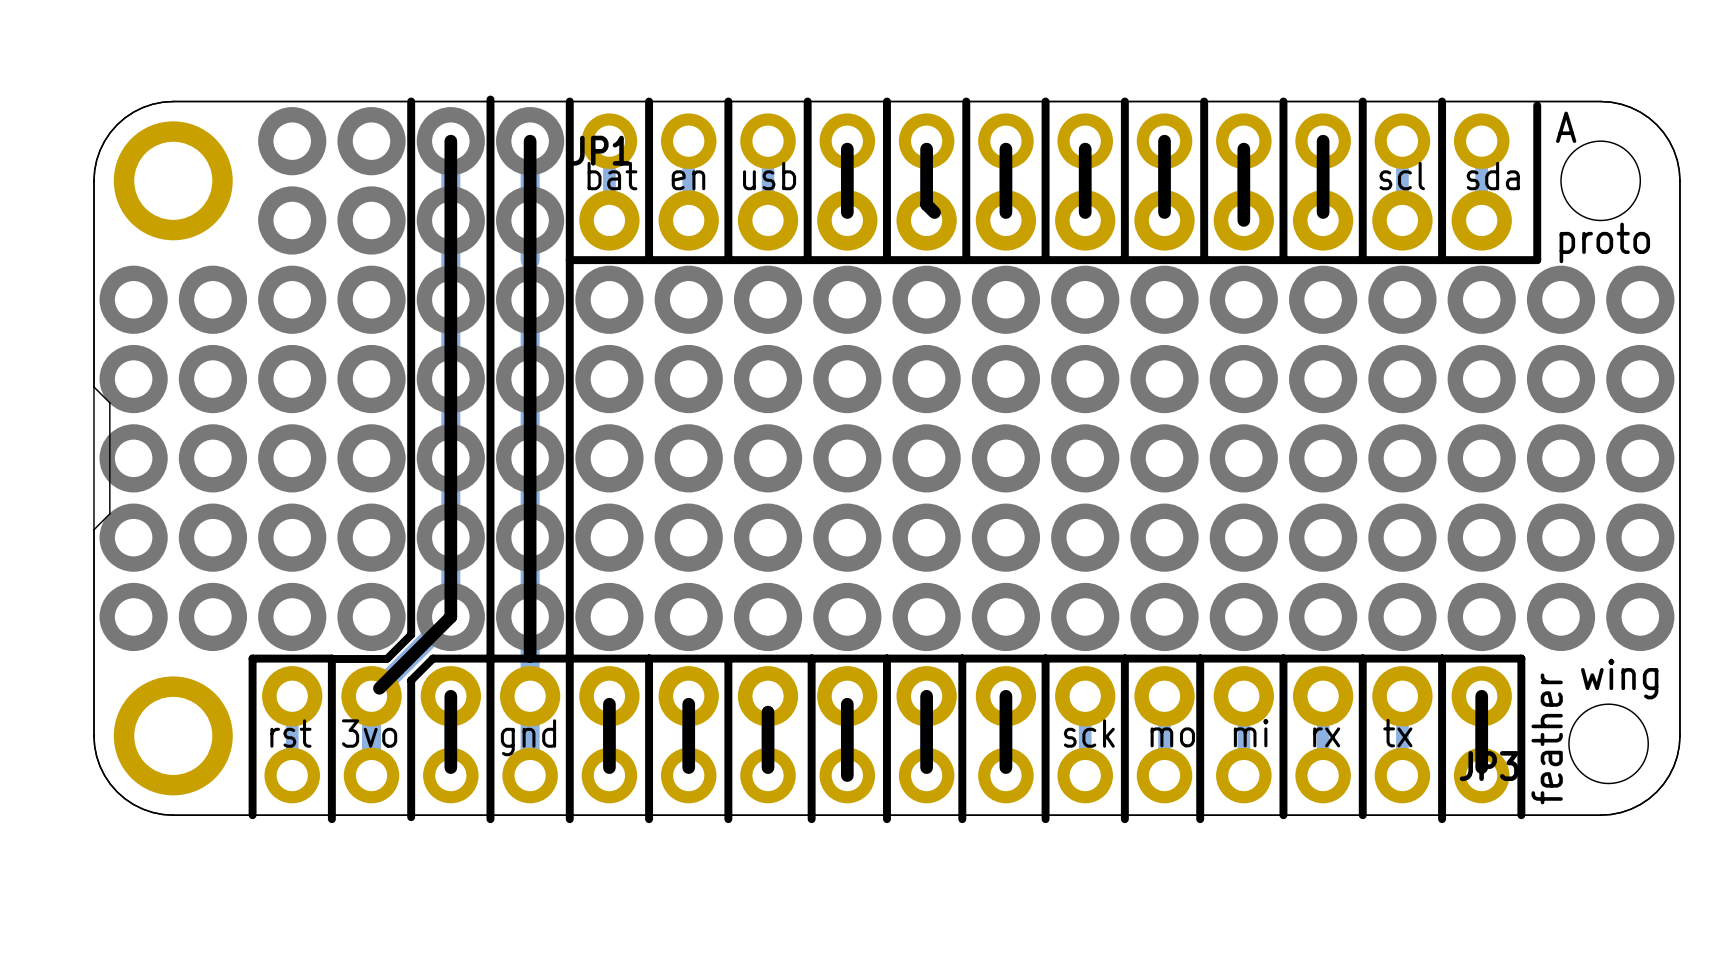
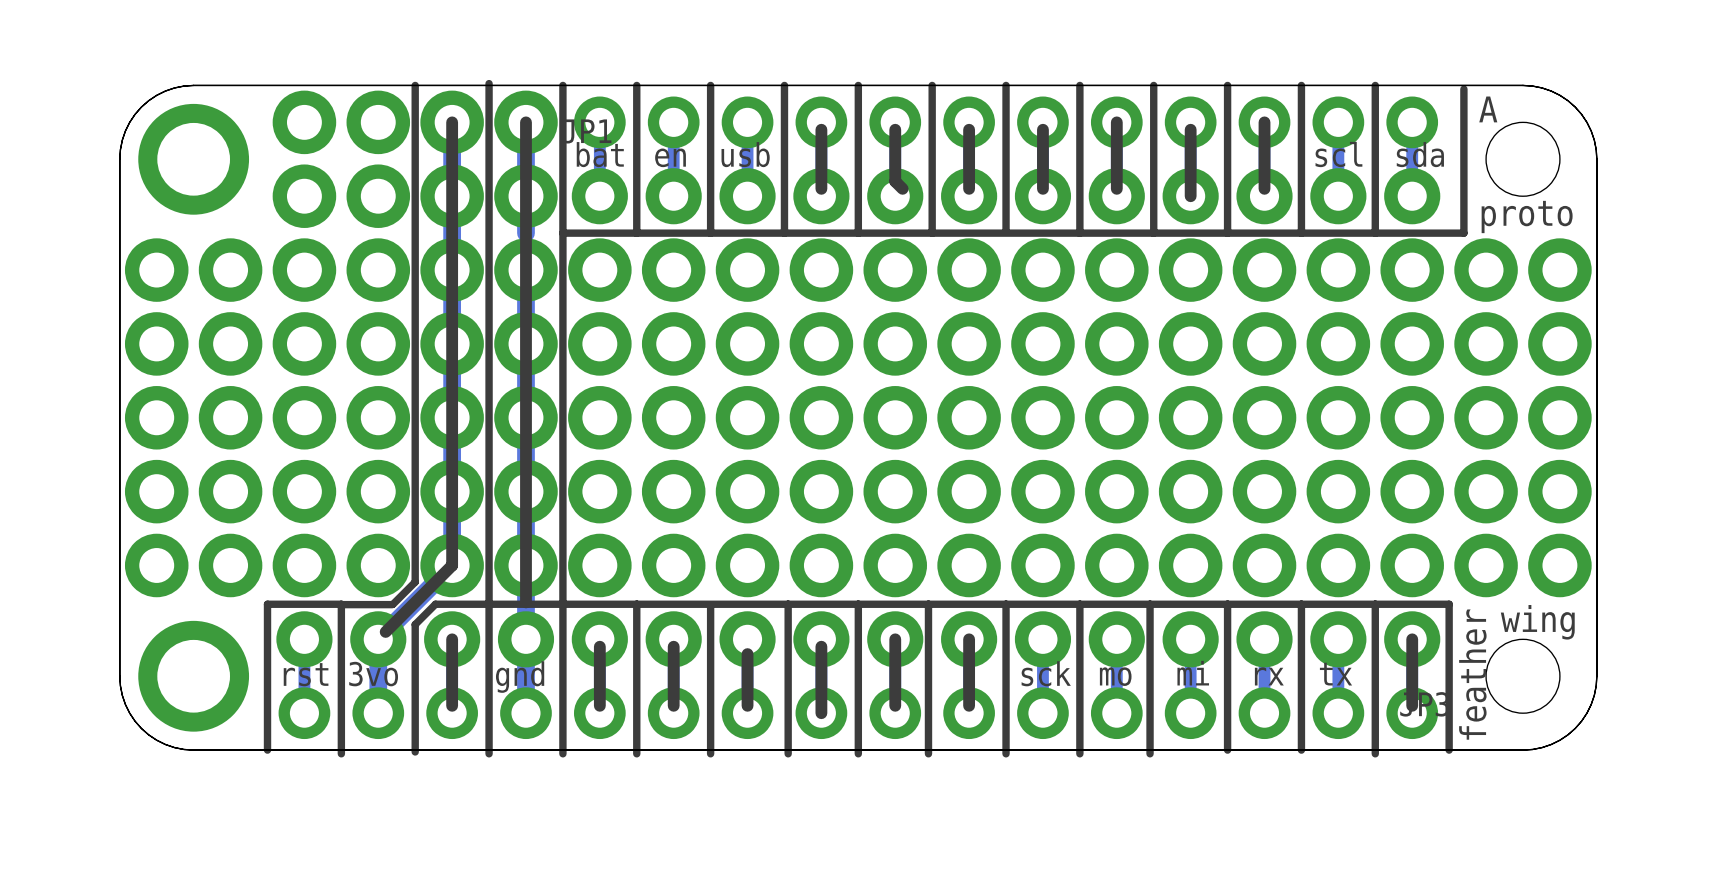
part footprint: [93, 101, 1680, 816] -> [119, 85, 1597, 751]

